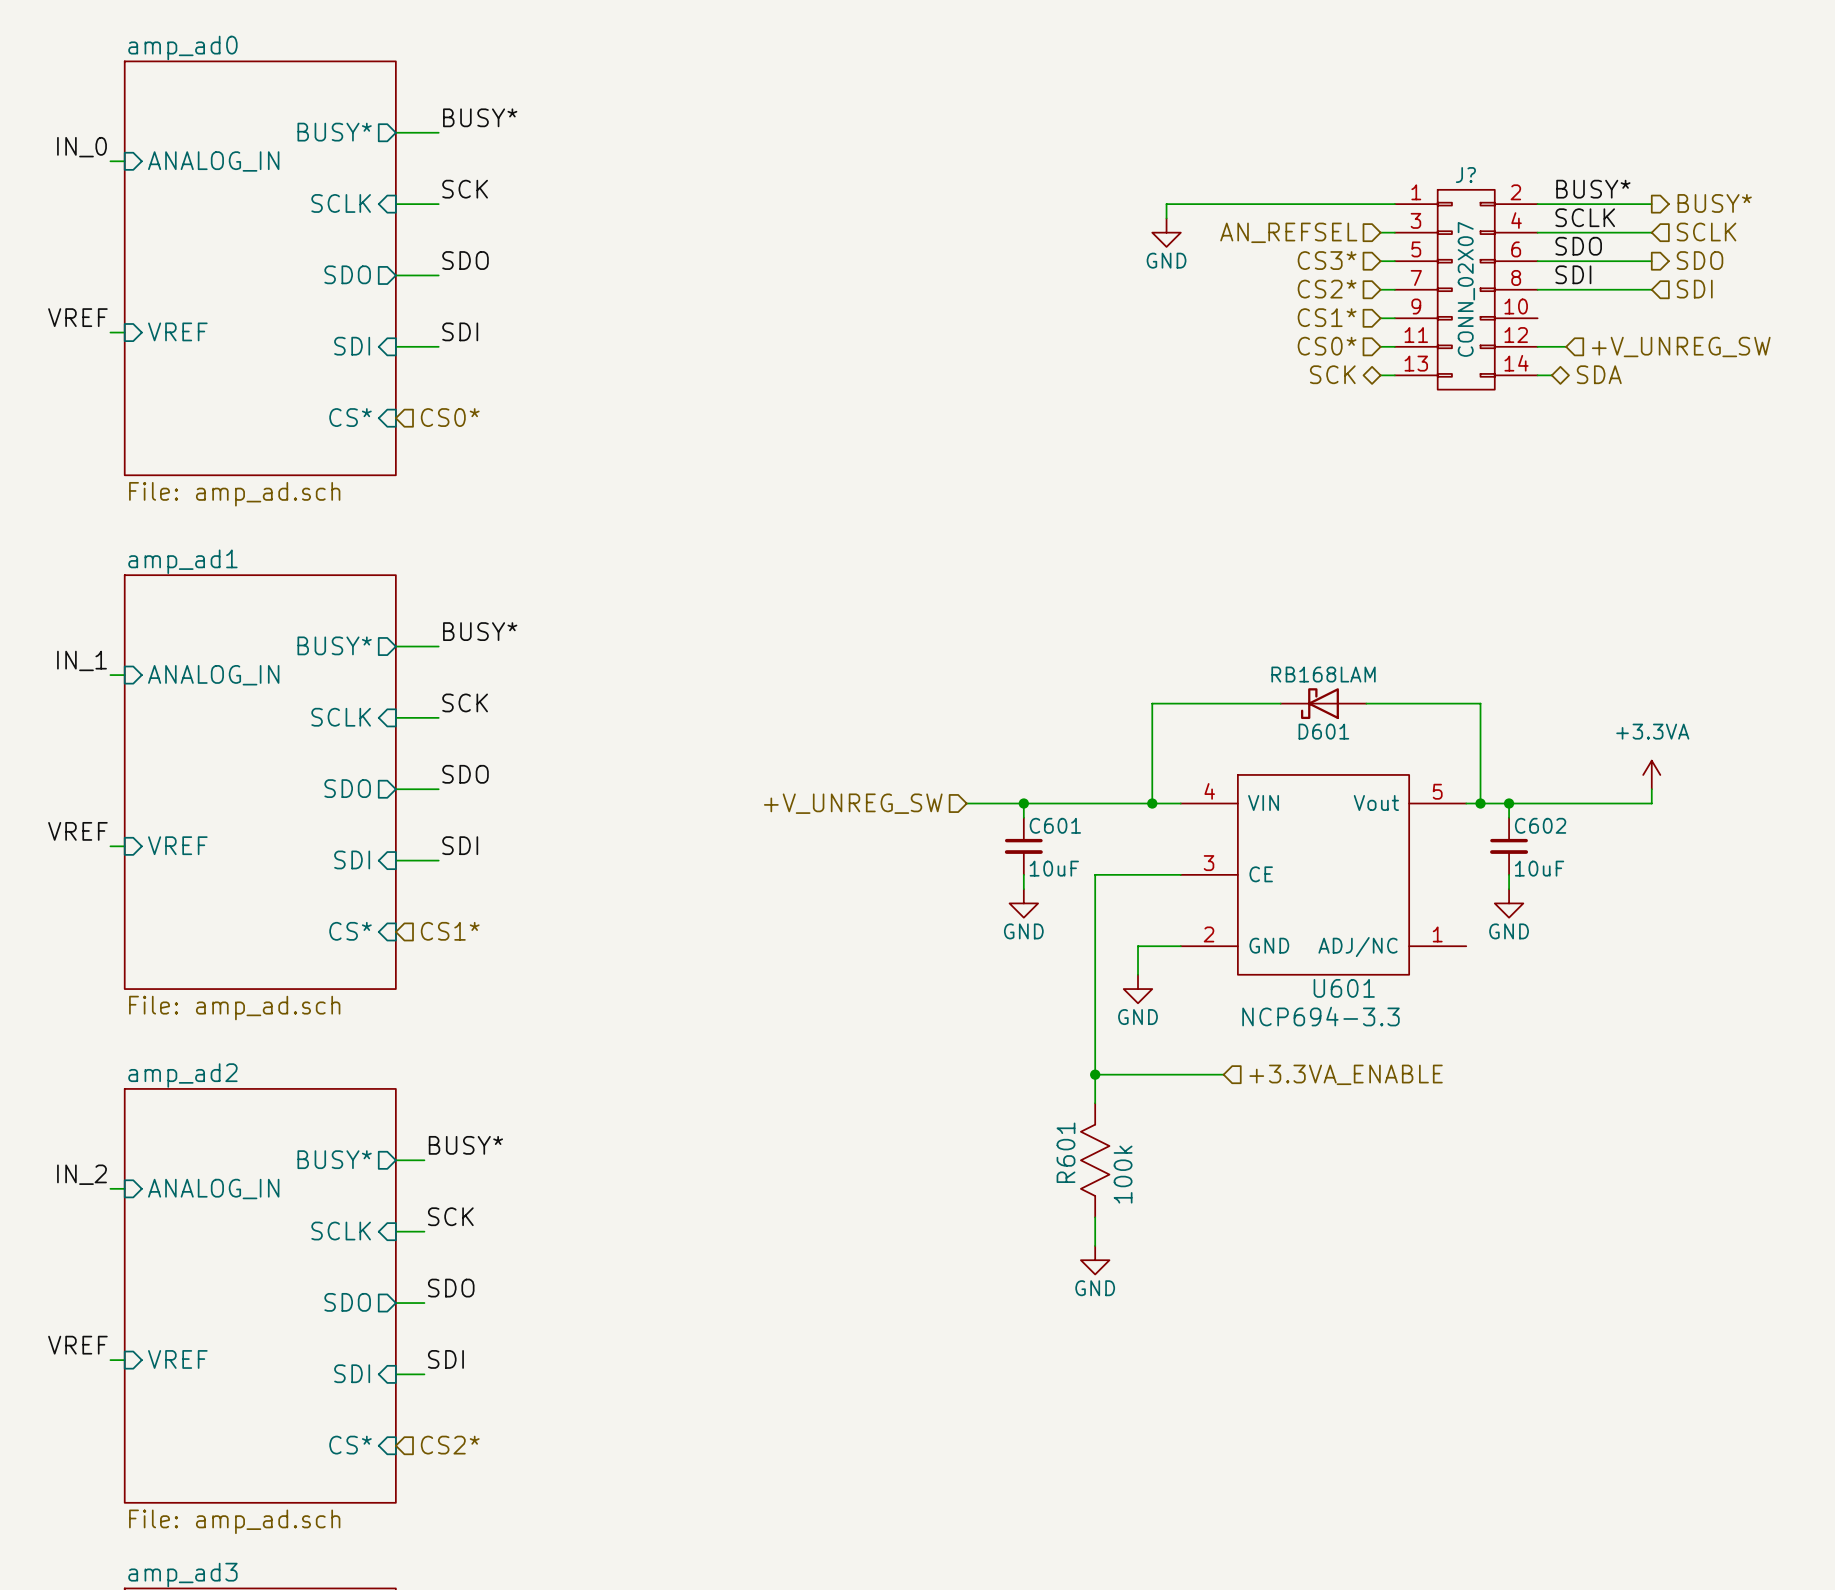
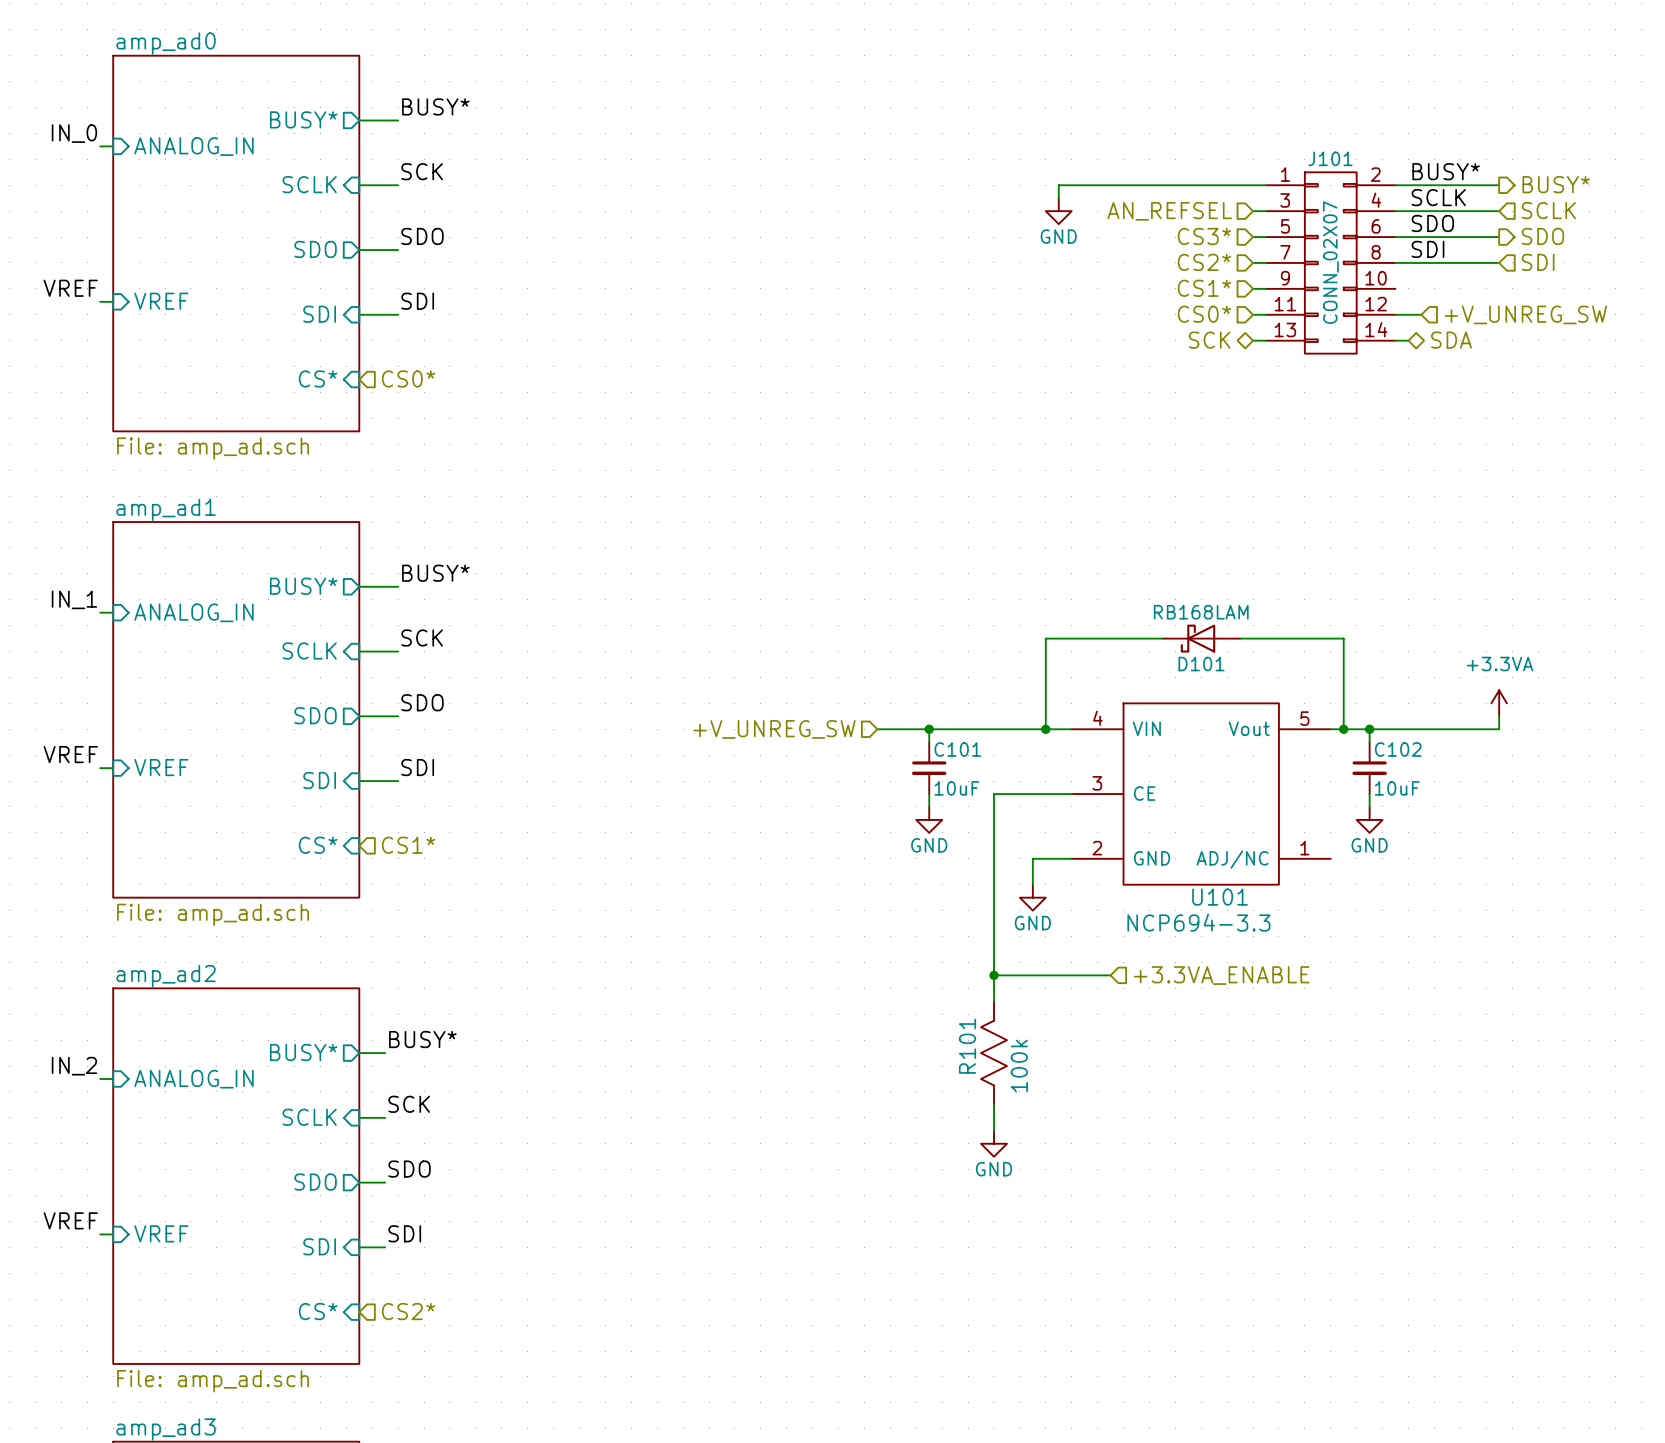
J? name: J? (1465, 175) -> J101 (1330, 158)
D601 name: D601 (1323, 731) -> D101 (1201, 664)
C601 name: C601 (1055, 825) -> C101 (957, 749)
C602 name: C602 (1540, 825) -> C102 (1398, 749)
U601 name: U601 (1344, 988) -> U101 (1220, 897)
R601 name: R601 (1066, 1152) -> R101 (967, 1046)

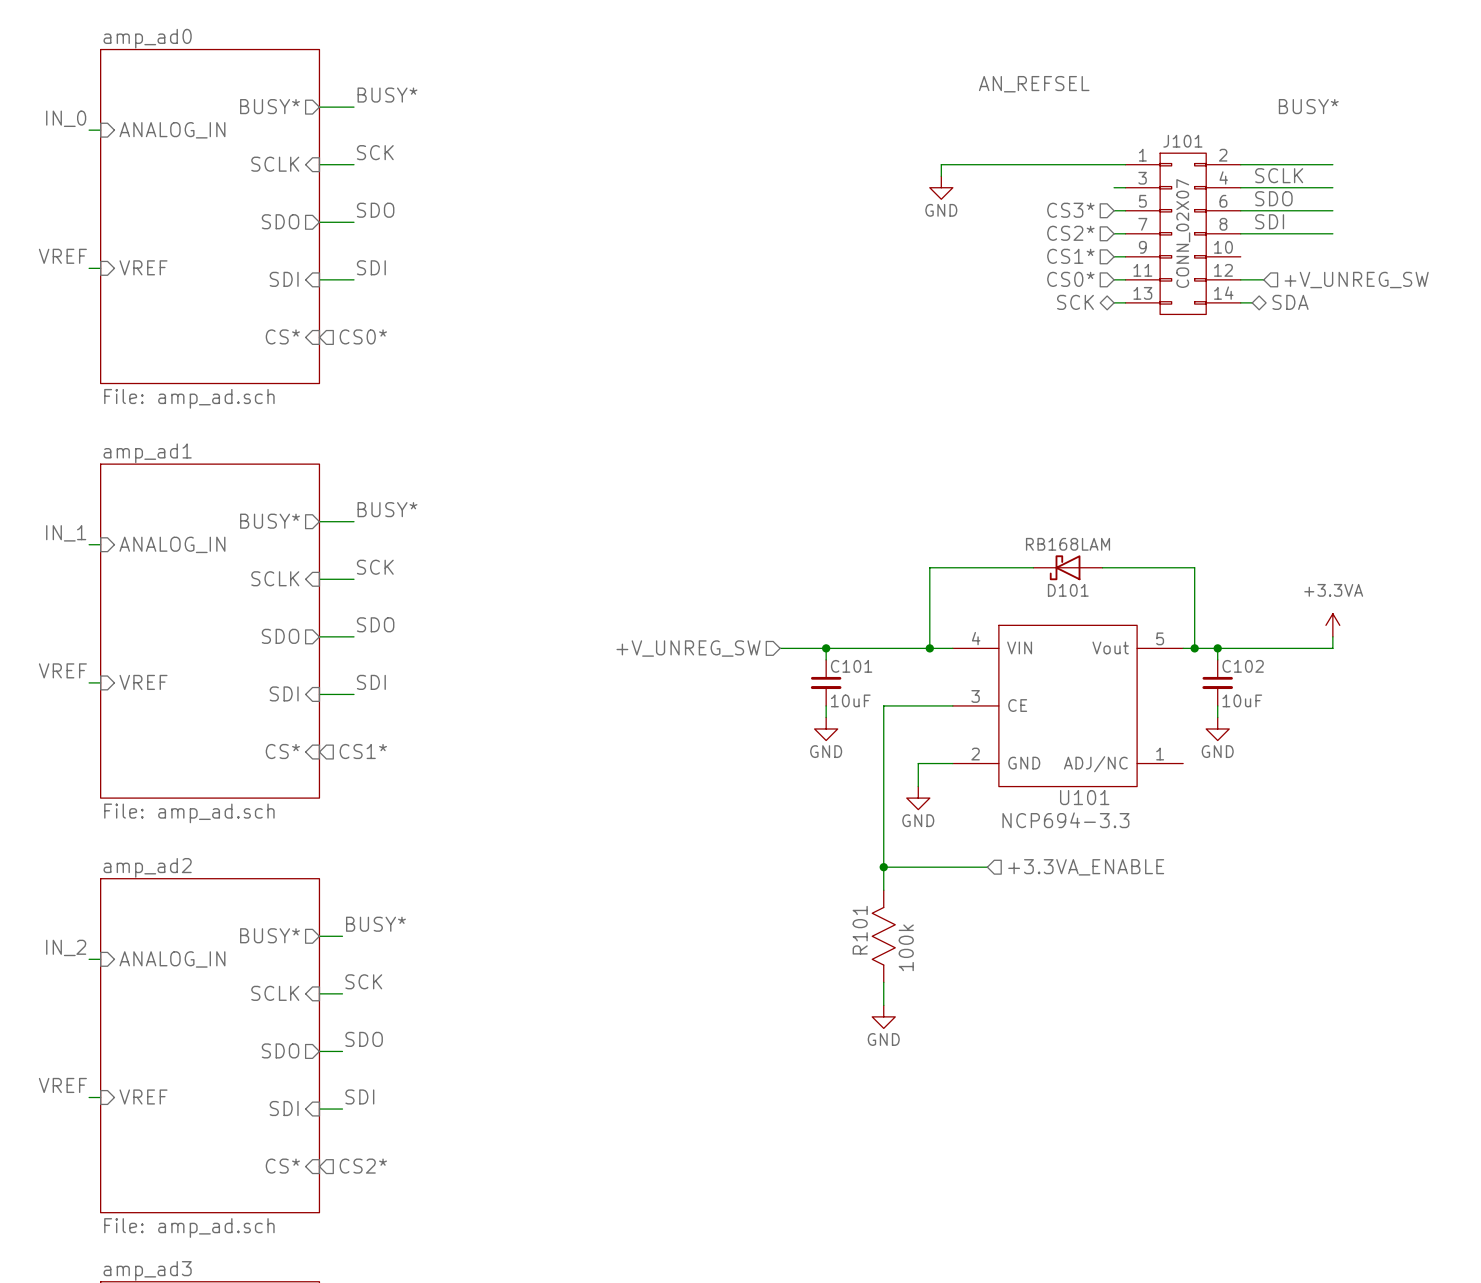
label: none -> AN_REFSEL (1034, 84)
label position: BUSY* (1446, 171) -> BUSY* (1308, 106)
hierarchical label: BUSY* (1556, 184) -> none
hierarchical label: SCLK (1548, 210) -> none
hierarchical label: AN_REFSEL (1169, 211) -> none
hierarchical label: SDO (1542, 236) -> none
hierarchical label: SDI (1538, 262) -> none

